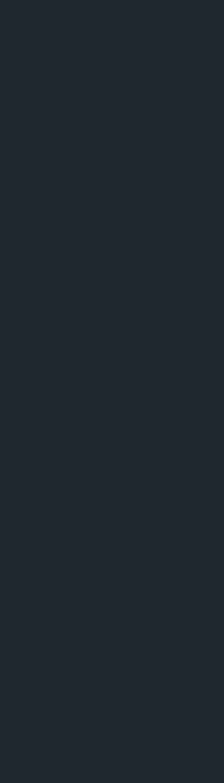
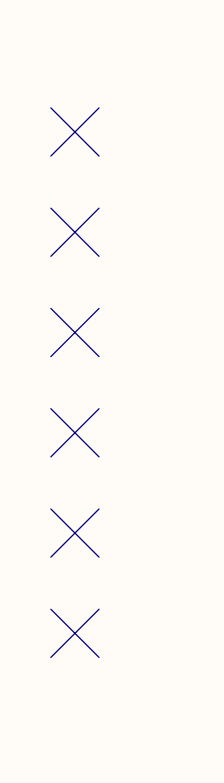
no-connect mark: none -> (74, 131)
no-connect mark: none -> (74, 232)
no-connect mark: none -> (74, 332)
no-connect mark: none -> (74, 432)
no-connect mark: none -> (74, 533)
no-connect mark: none -> (74, 633)

